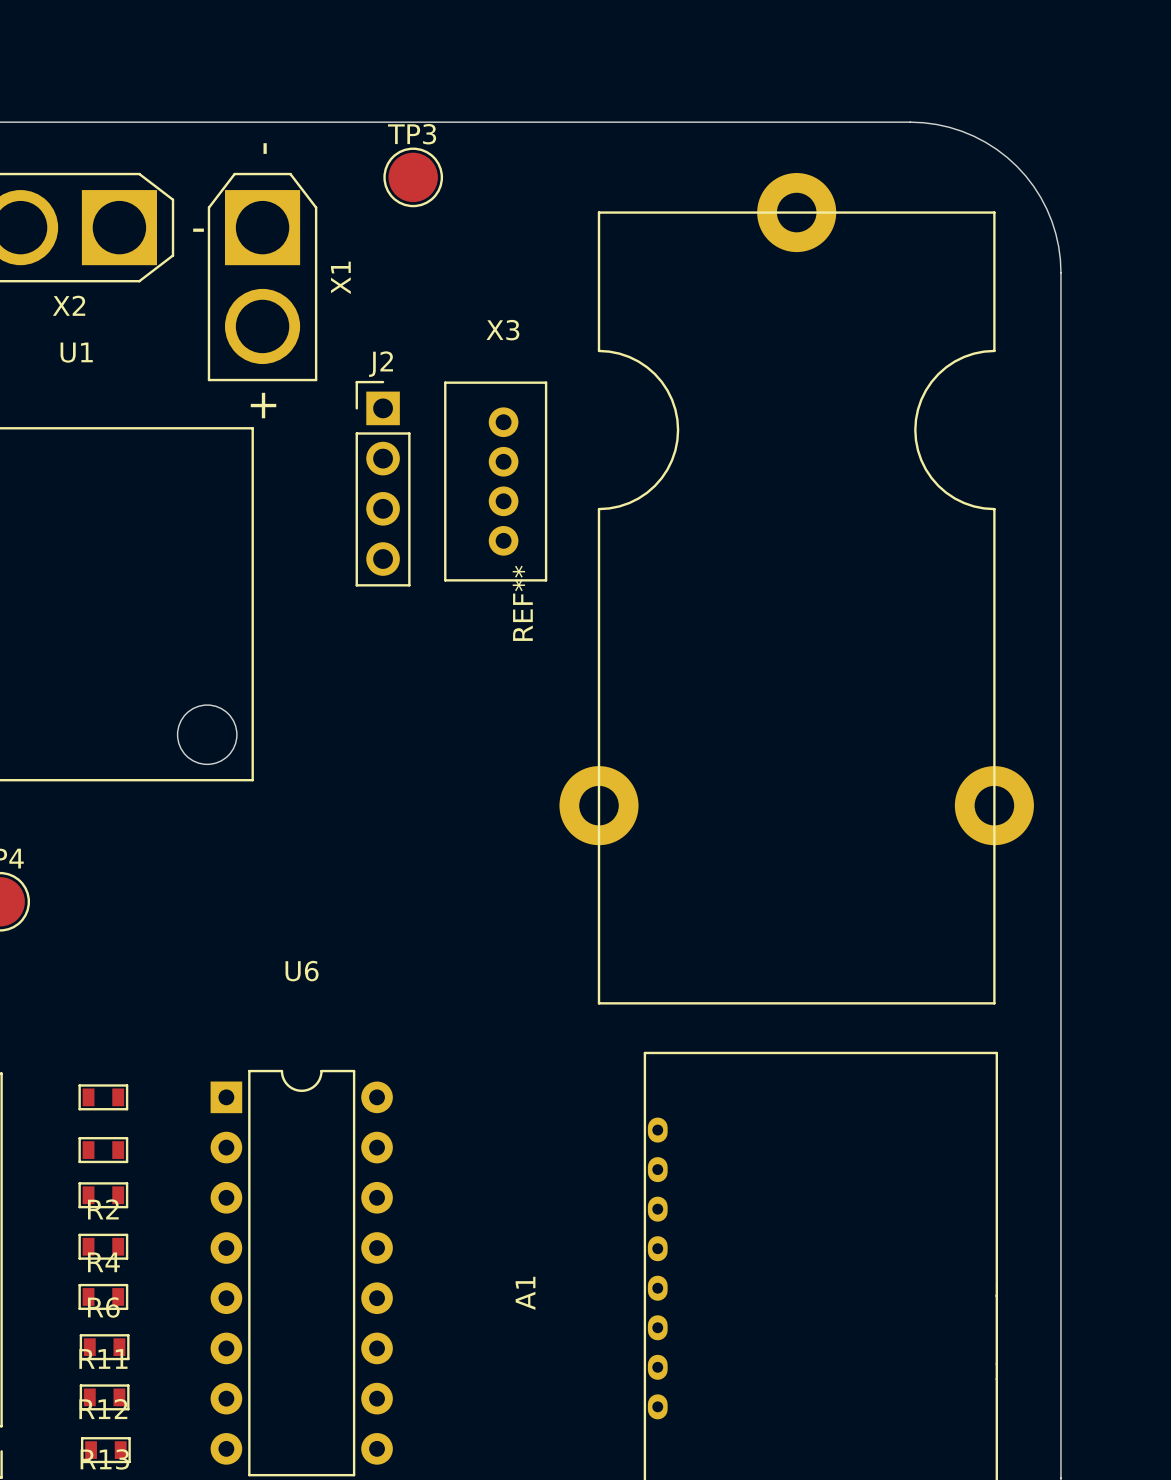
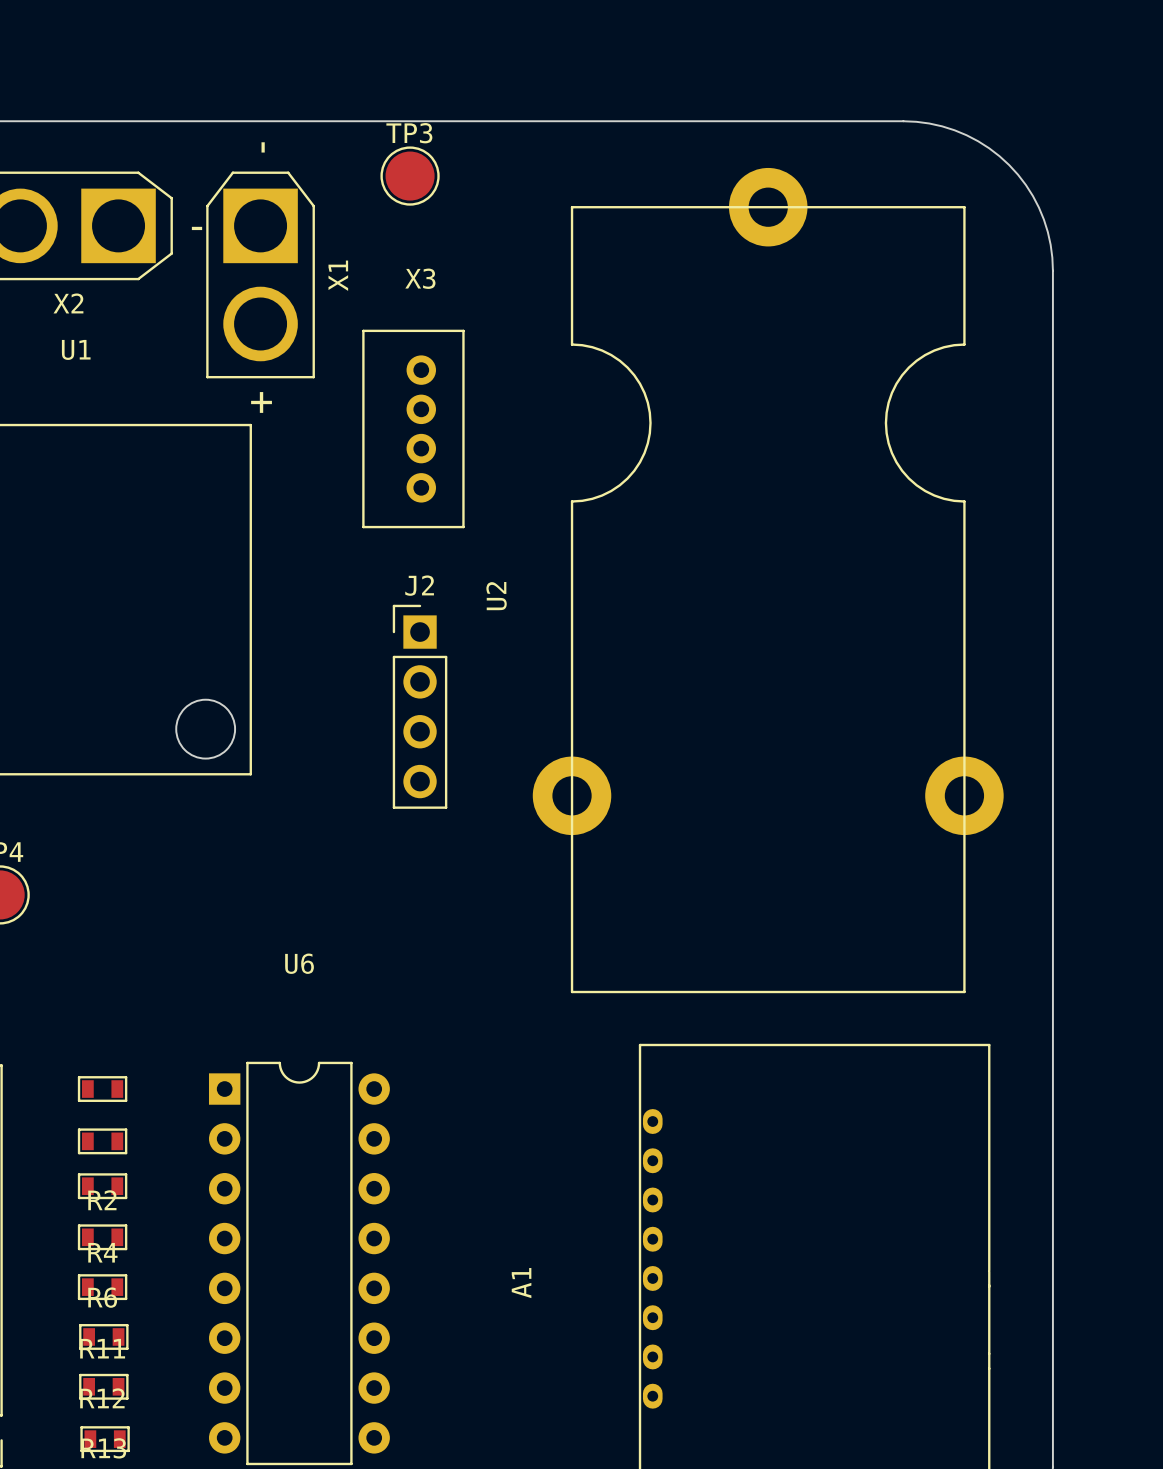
X3 position: (495, 481) -> (413, 428)
J2 position: (383, 483) -> (420, 706)
U2: none -> (768, 580)
REF**: (796, 588) -> none

